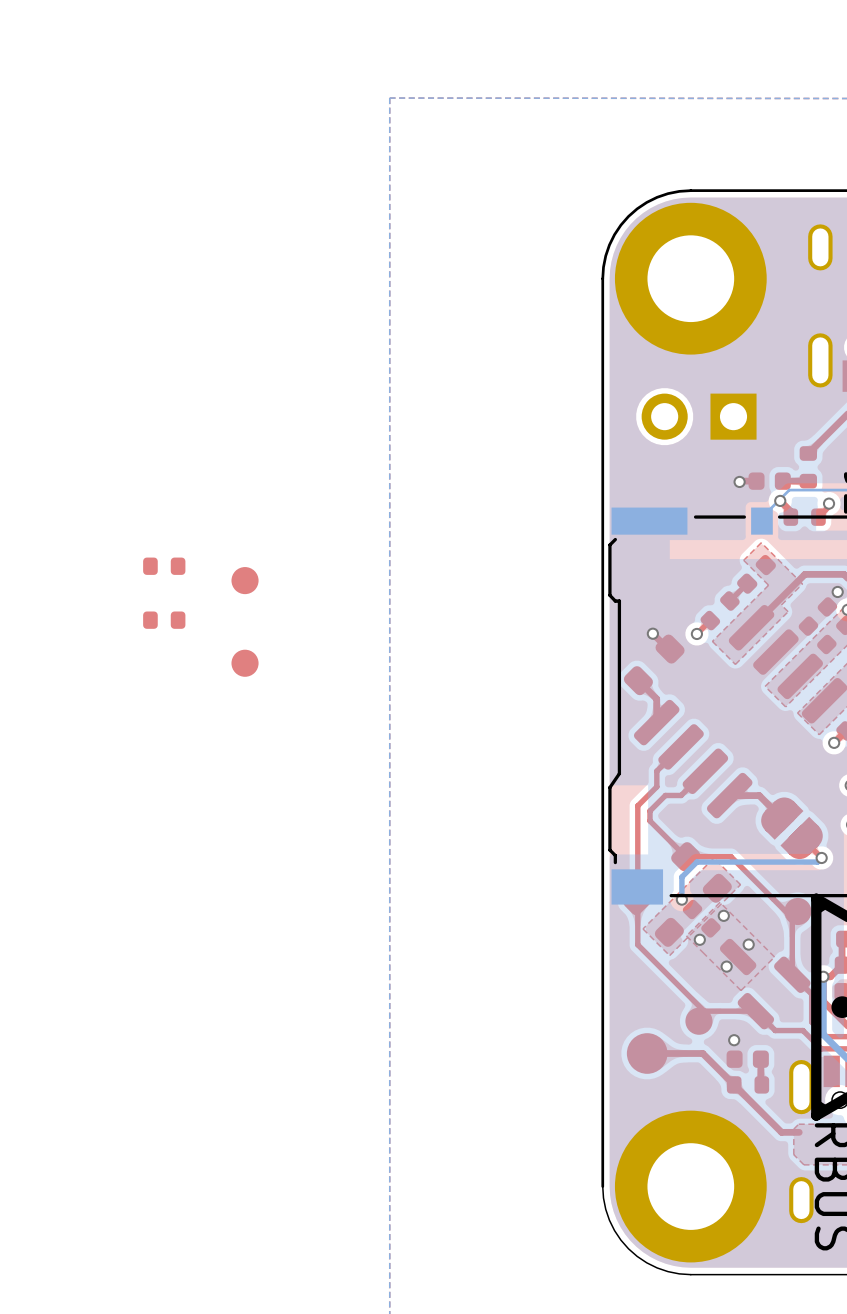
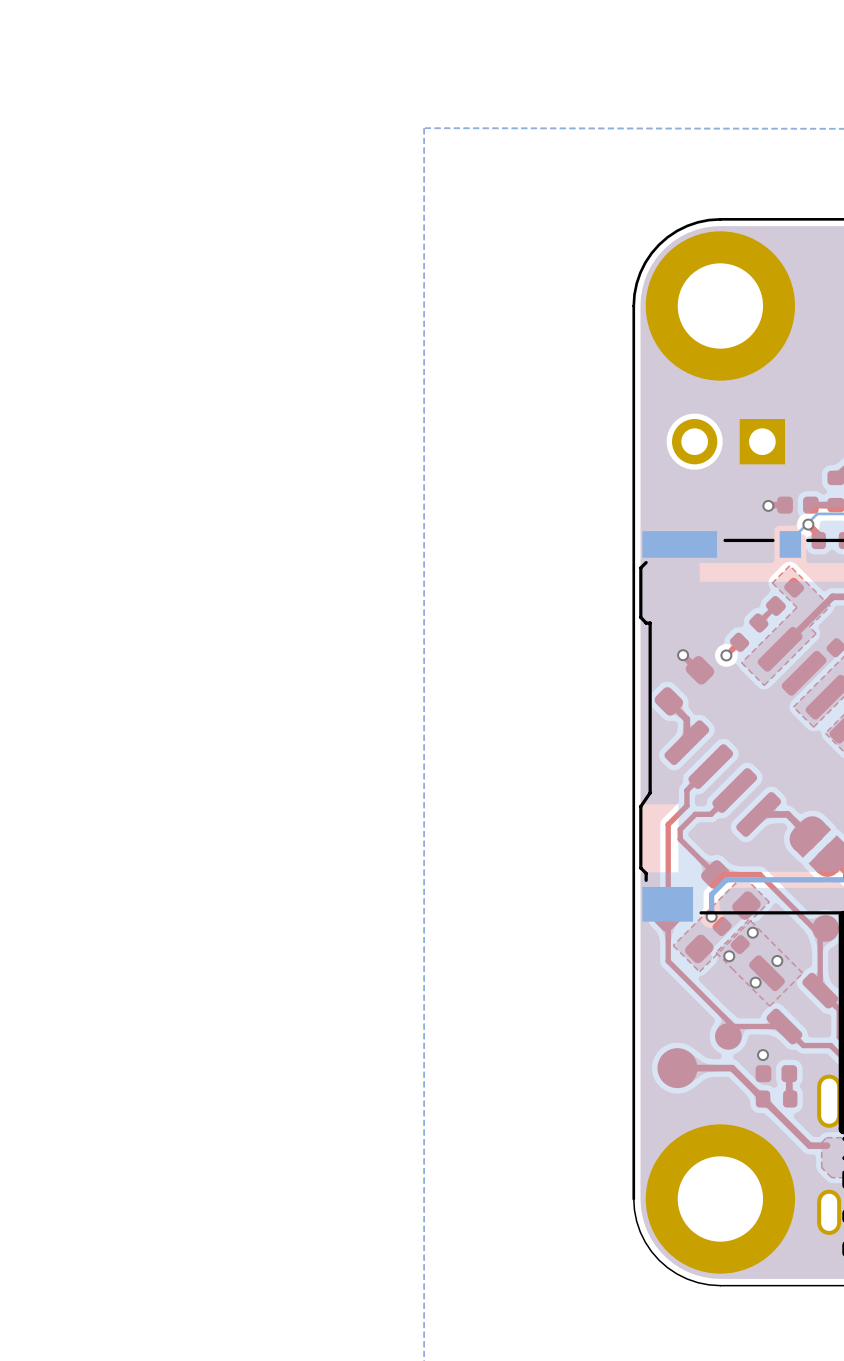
part: (164, 566) -> none
part: (245, 580) -> none
part: (164, 620) -> none
part: (245, 663) -> none

